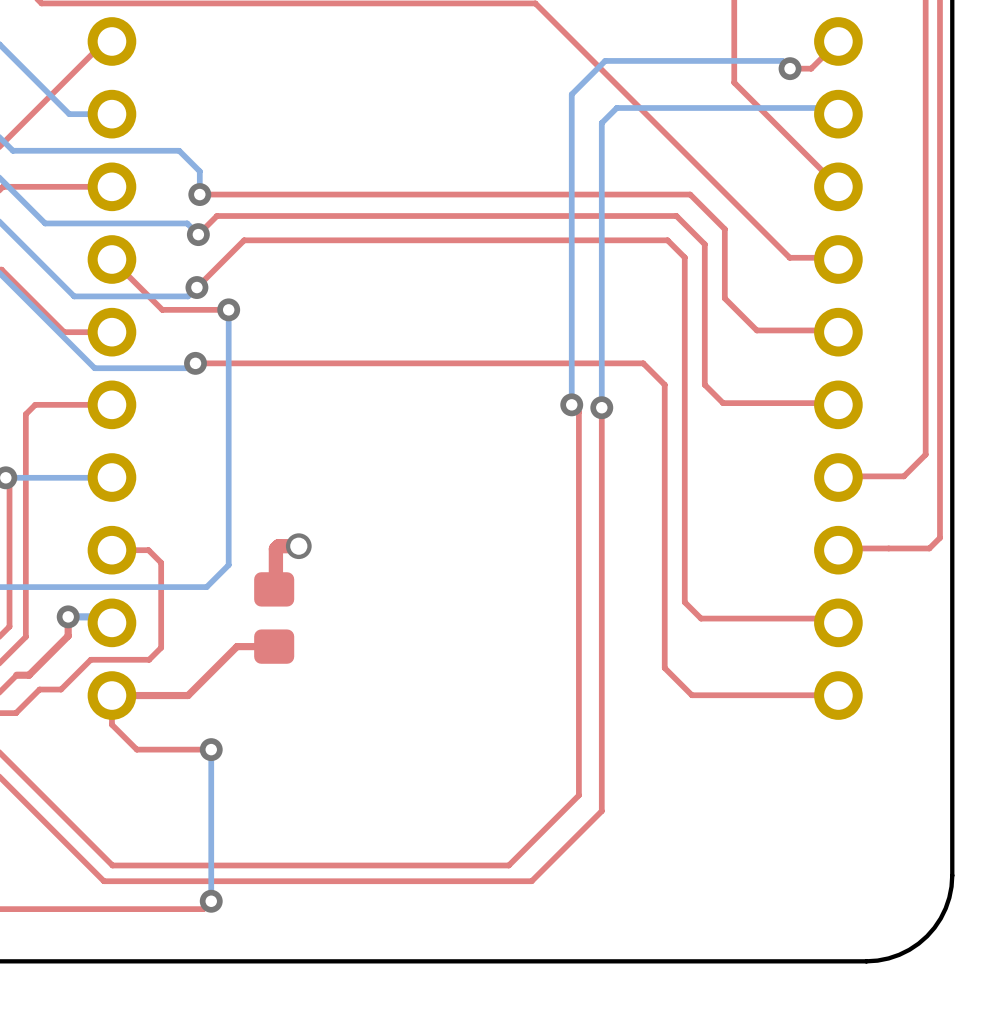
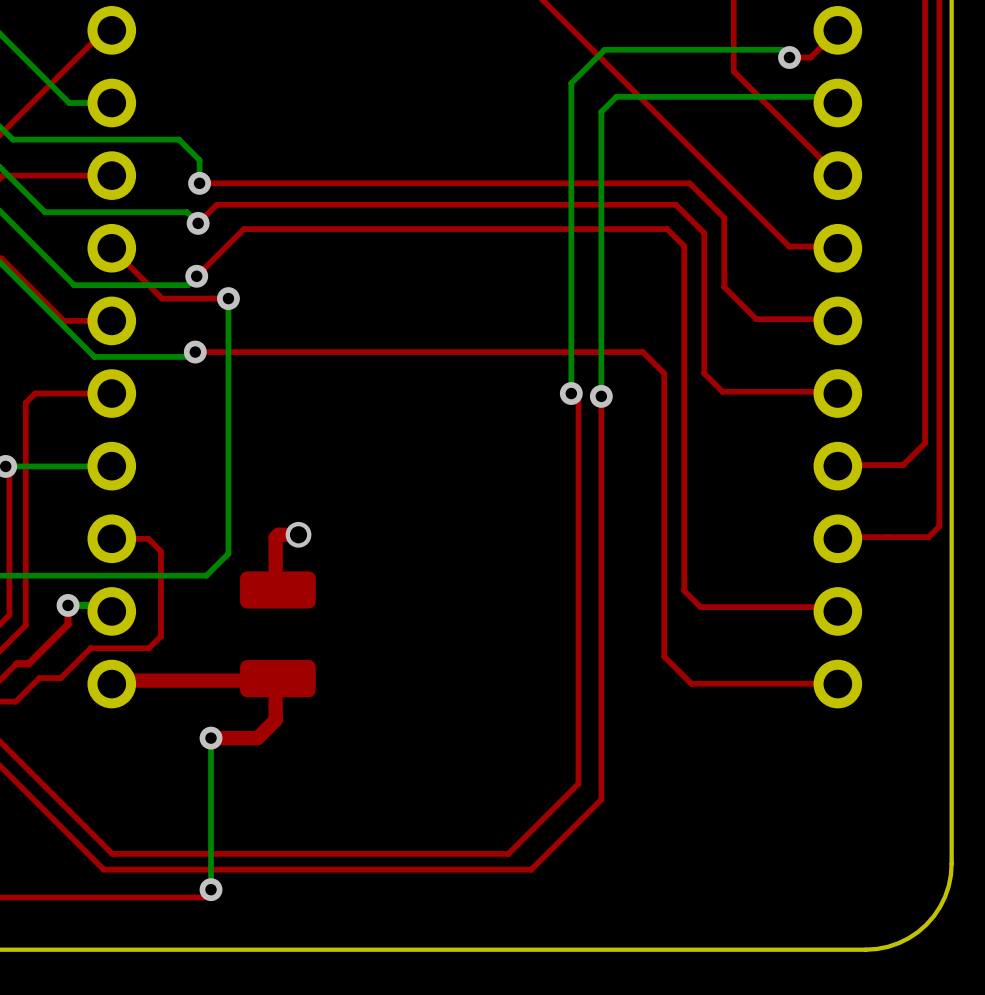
part footprint: [254, 572, 295, 664] -> [240, 571, 316, 698]
top track: (274, 646) (236, 646) (188, 695) (111, 695) (111, 724) (136, 749) (211, 749) -> (111, 684) (115, 680) (275, 680) (275, 720) (257, 738) (211, 738)

